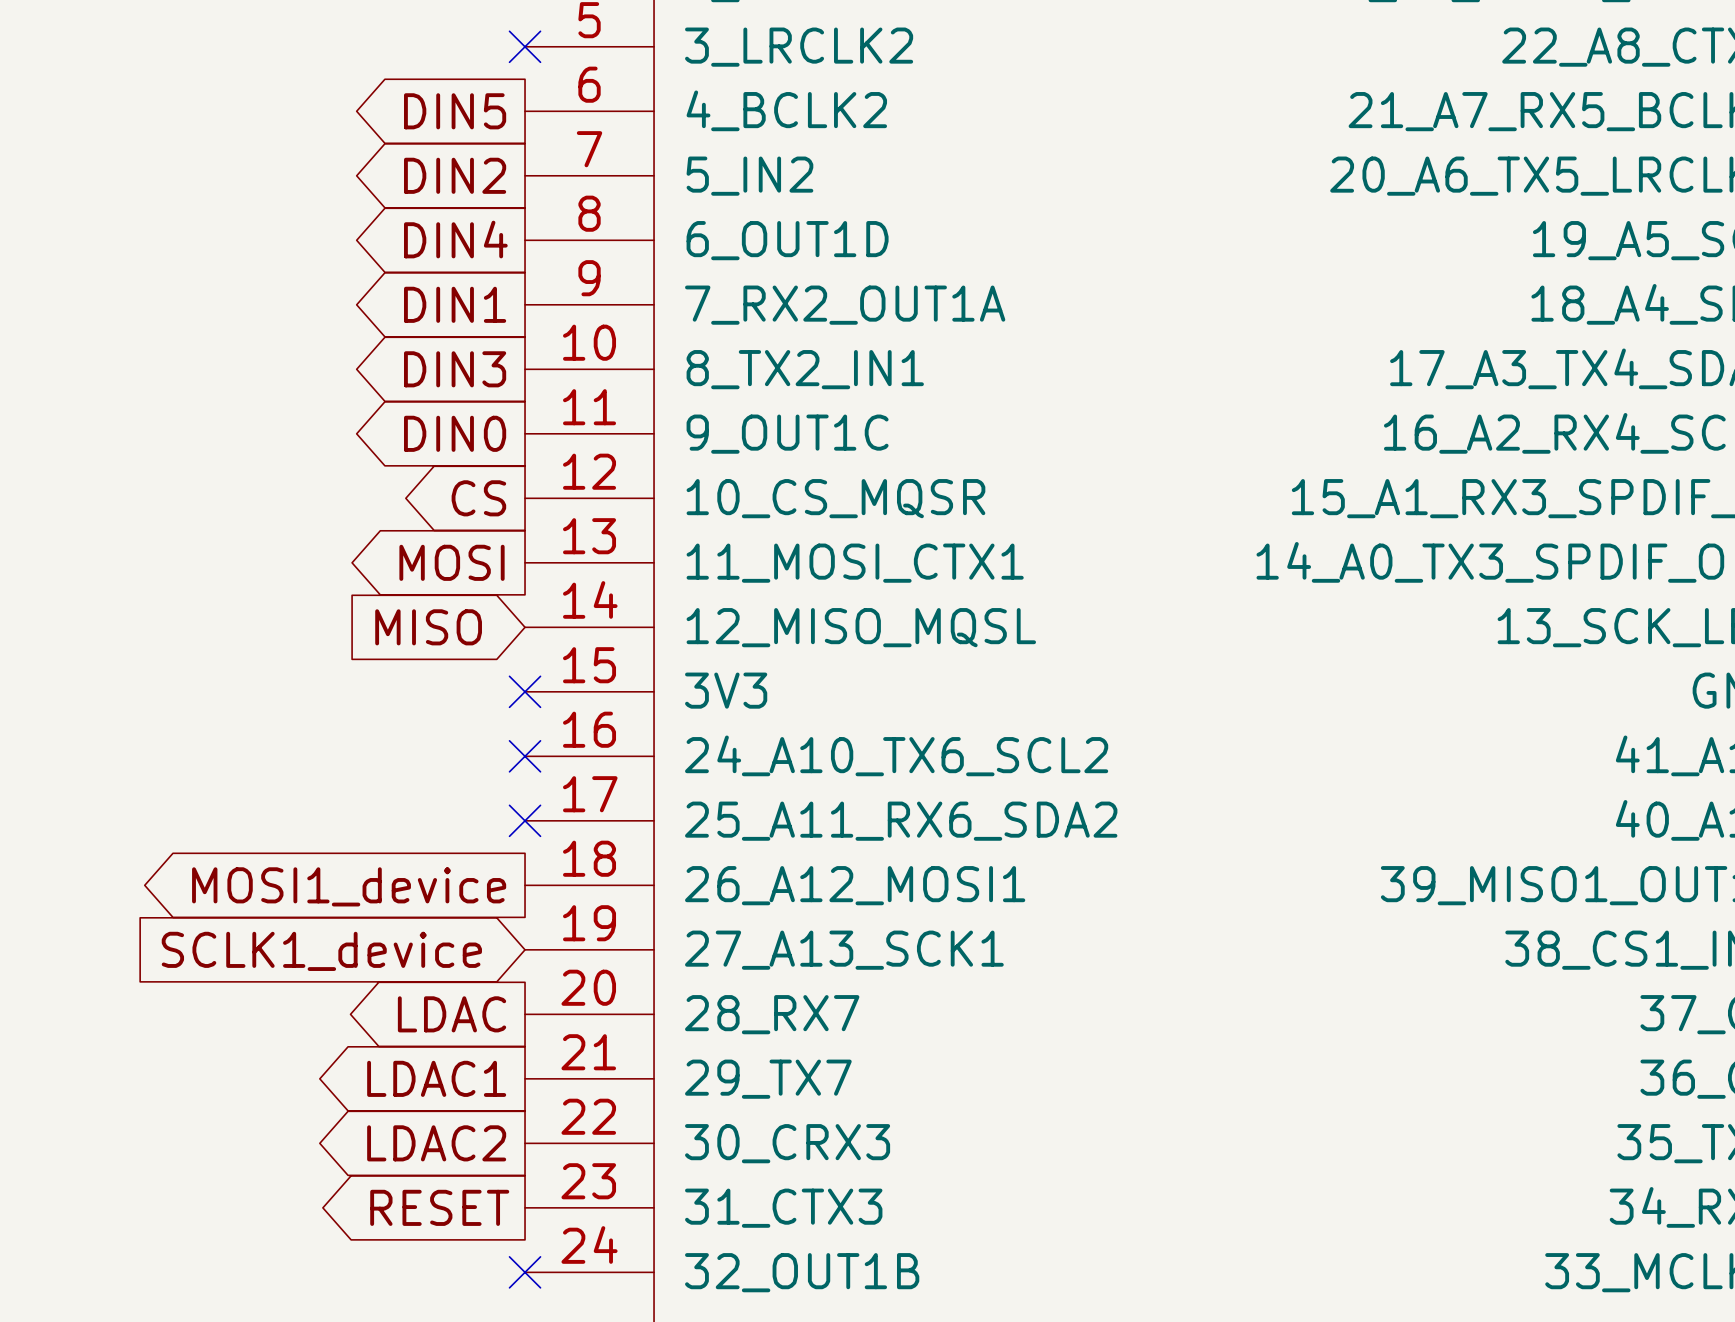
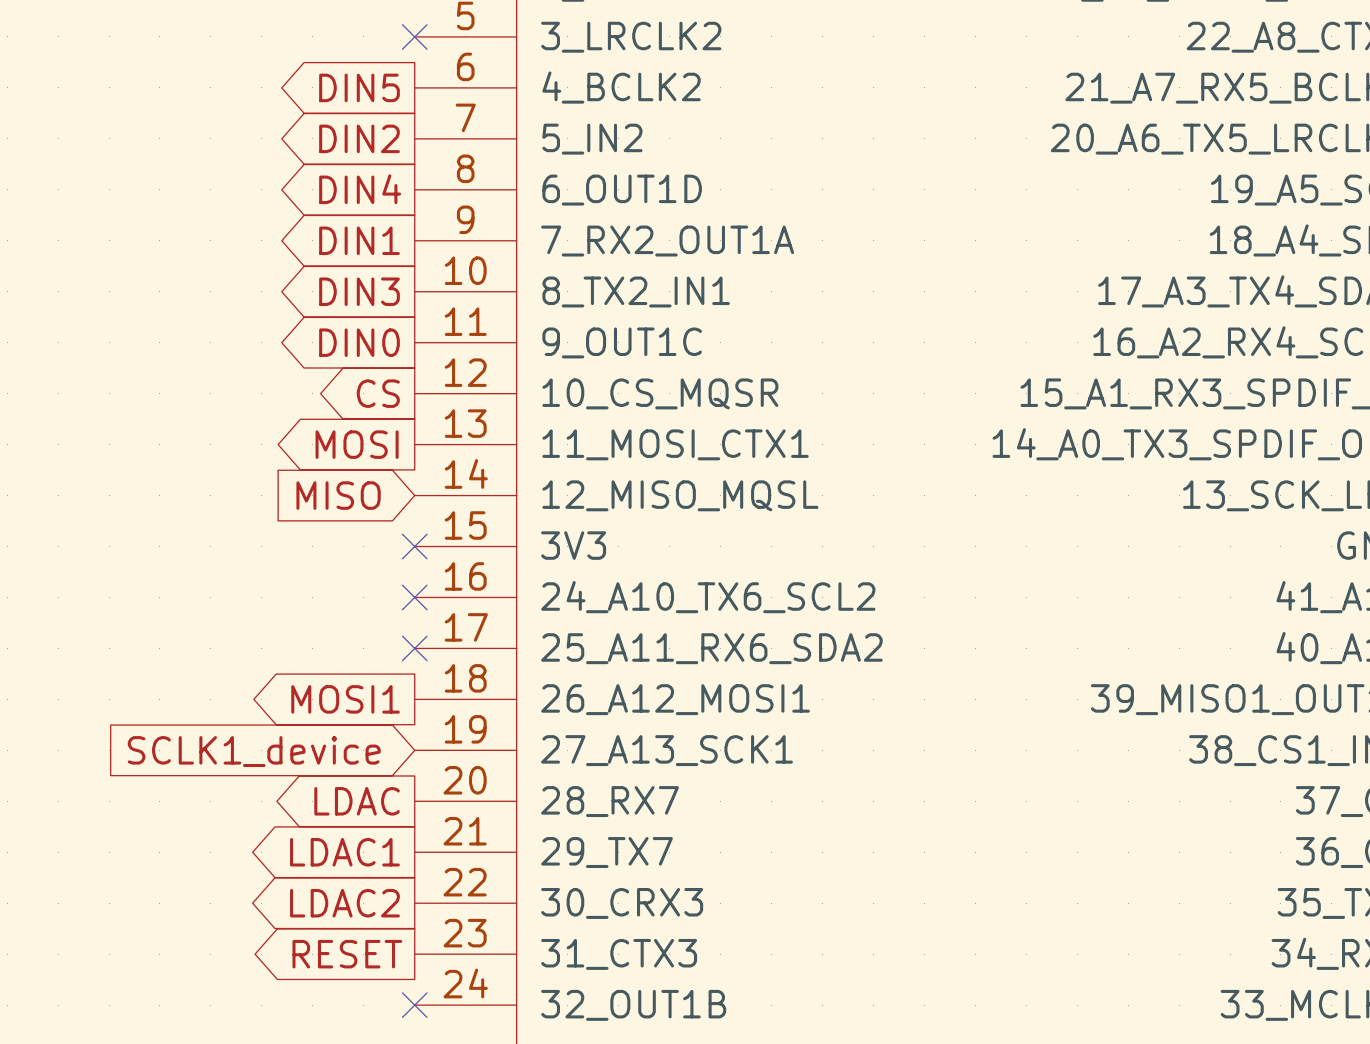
global label: MOSI1_device (349, 886) -> MOSI1 (345, 699)

